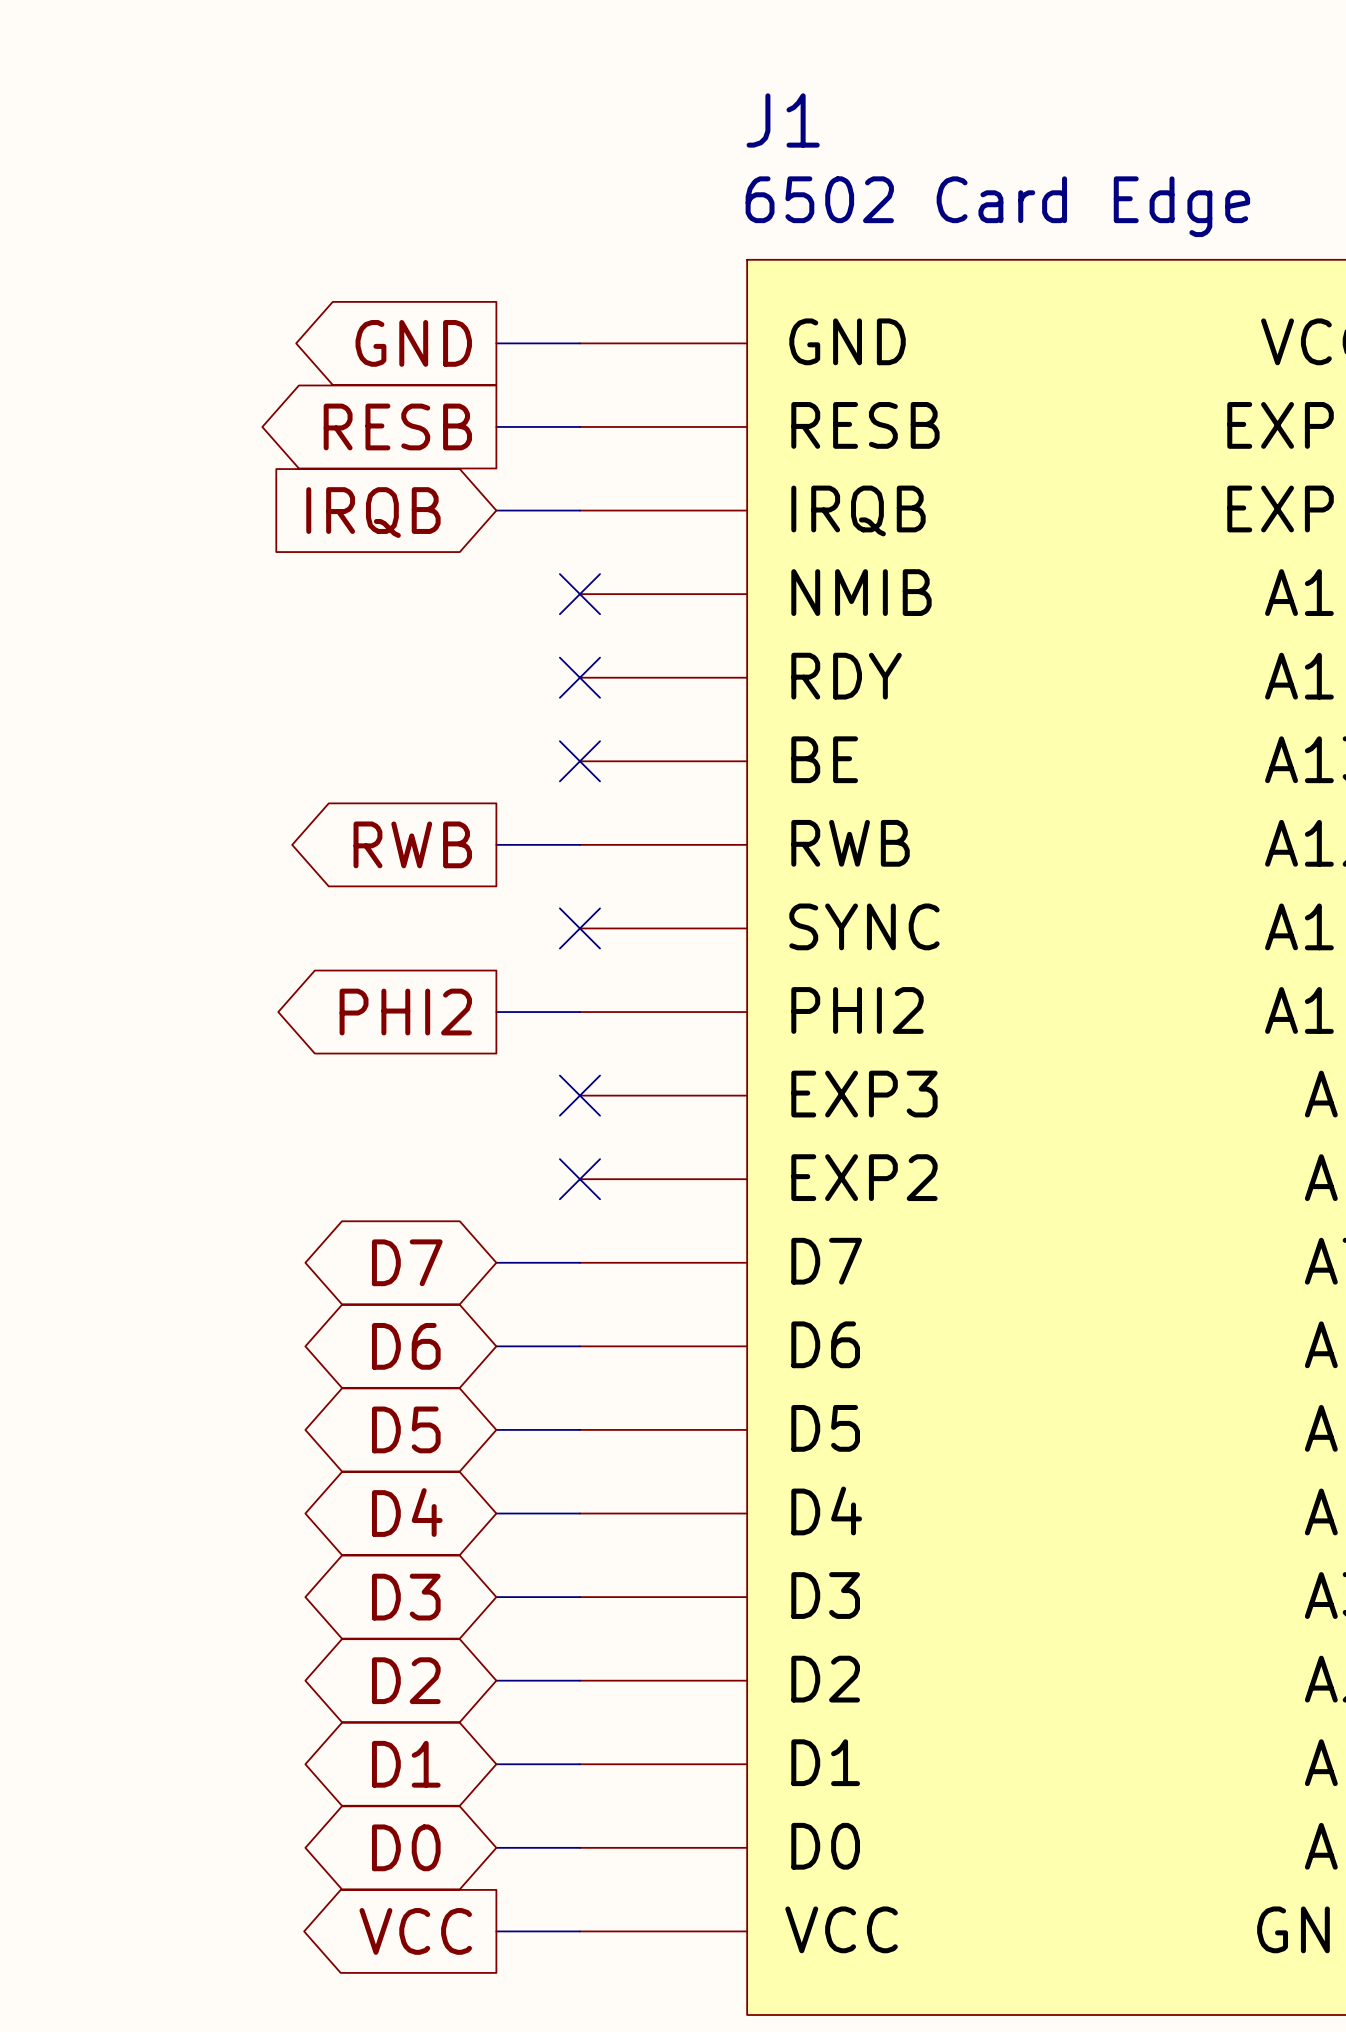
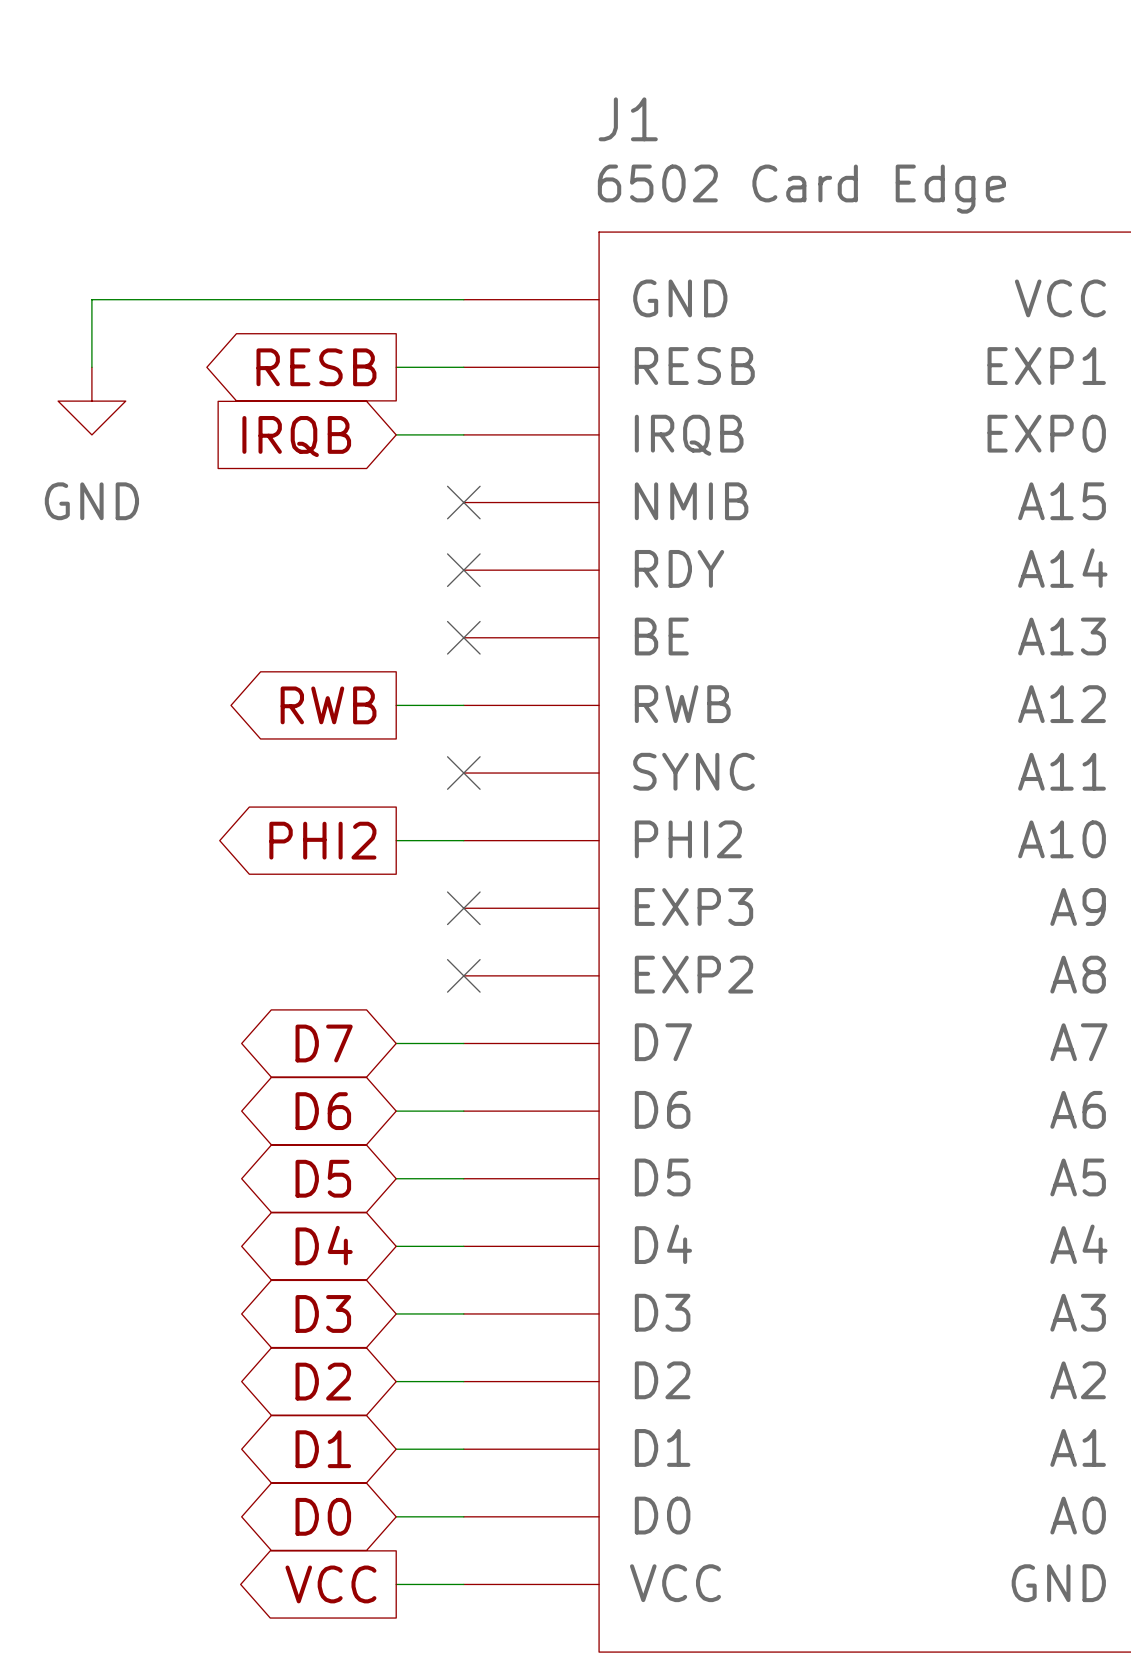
global label: GND (413, 343) -> none
wire: none -> (396, 299) (91, 299) (91, 367)
power symbol: none -> GND (91, 401)

